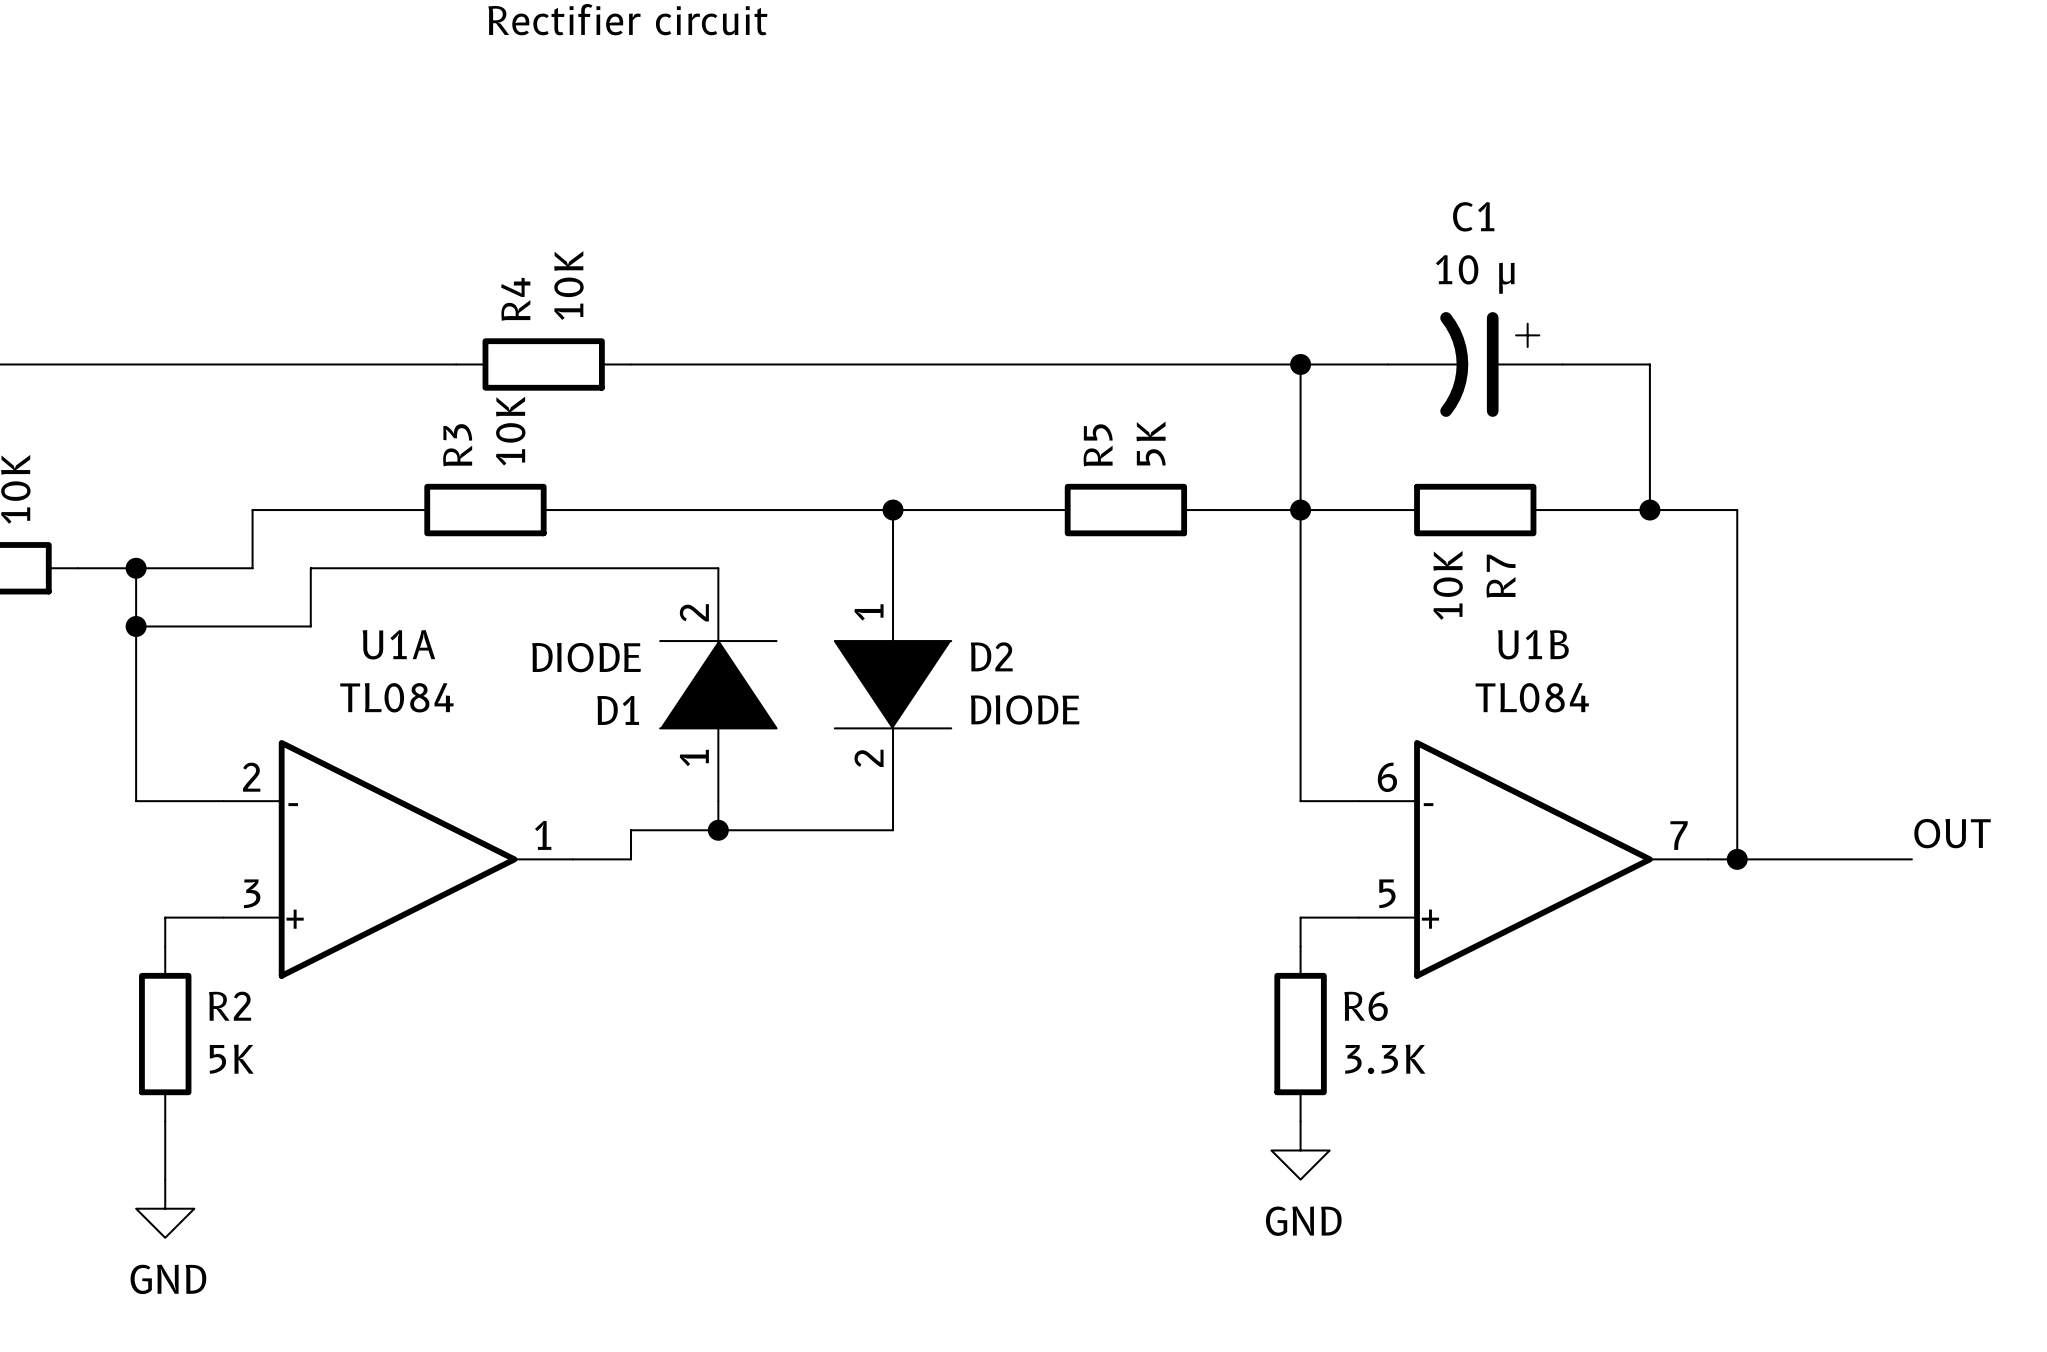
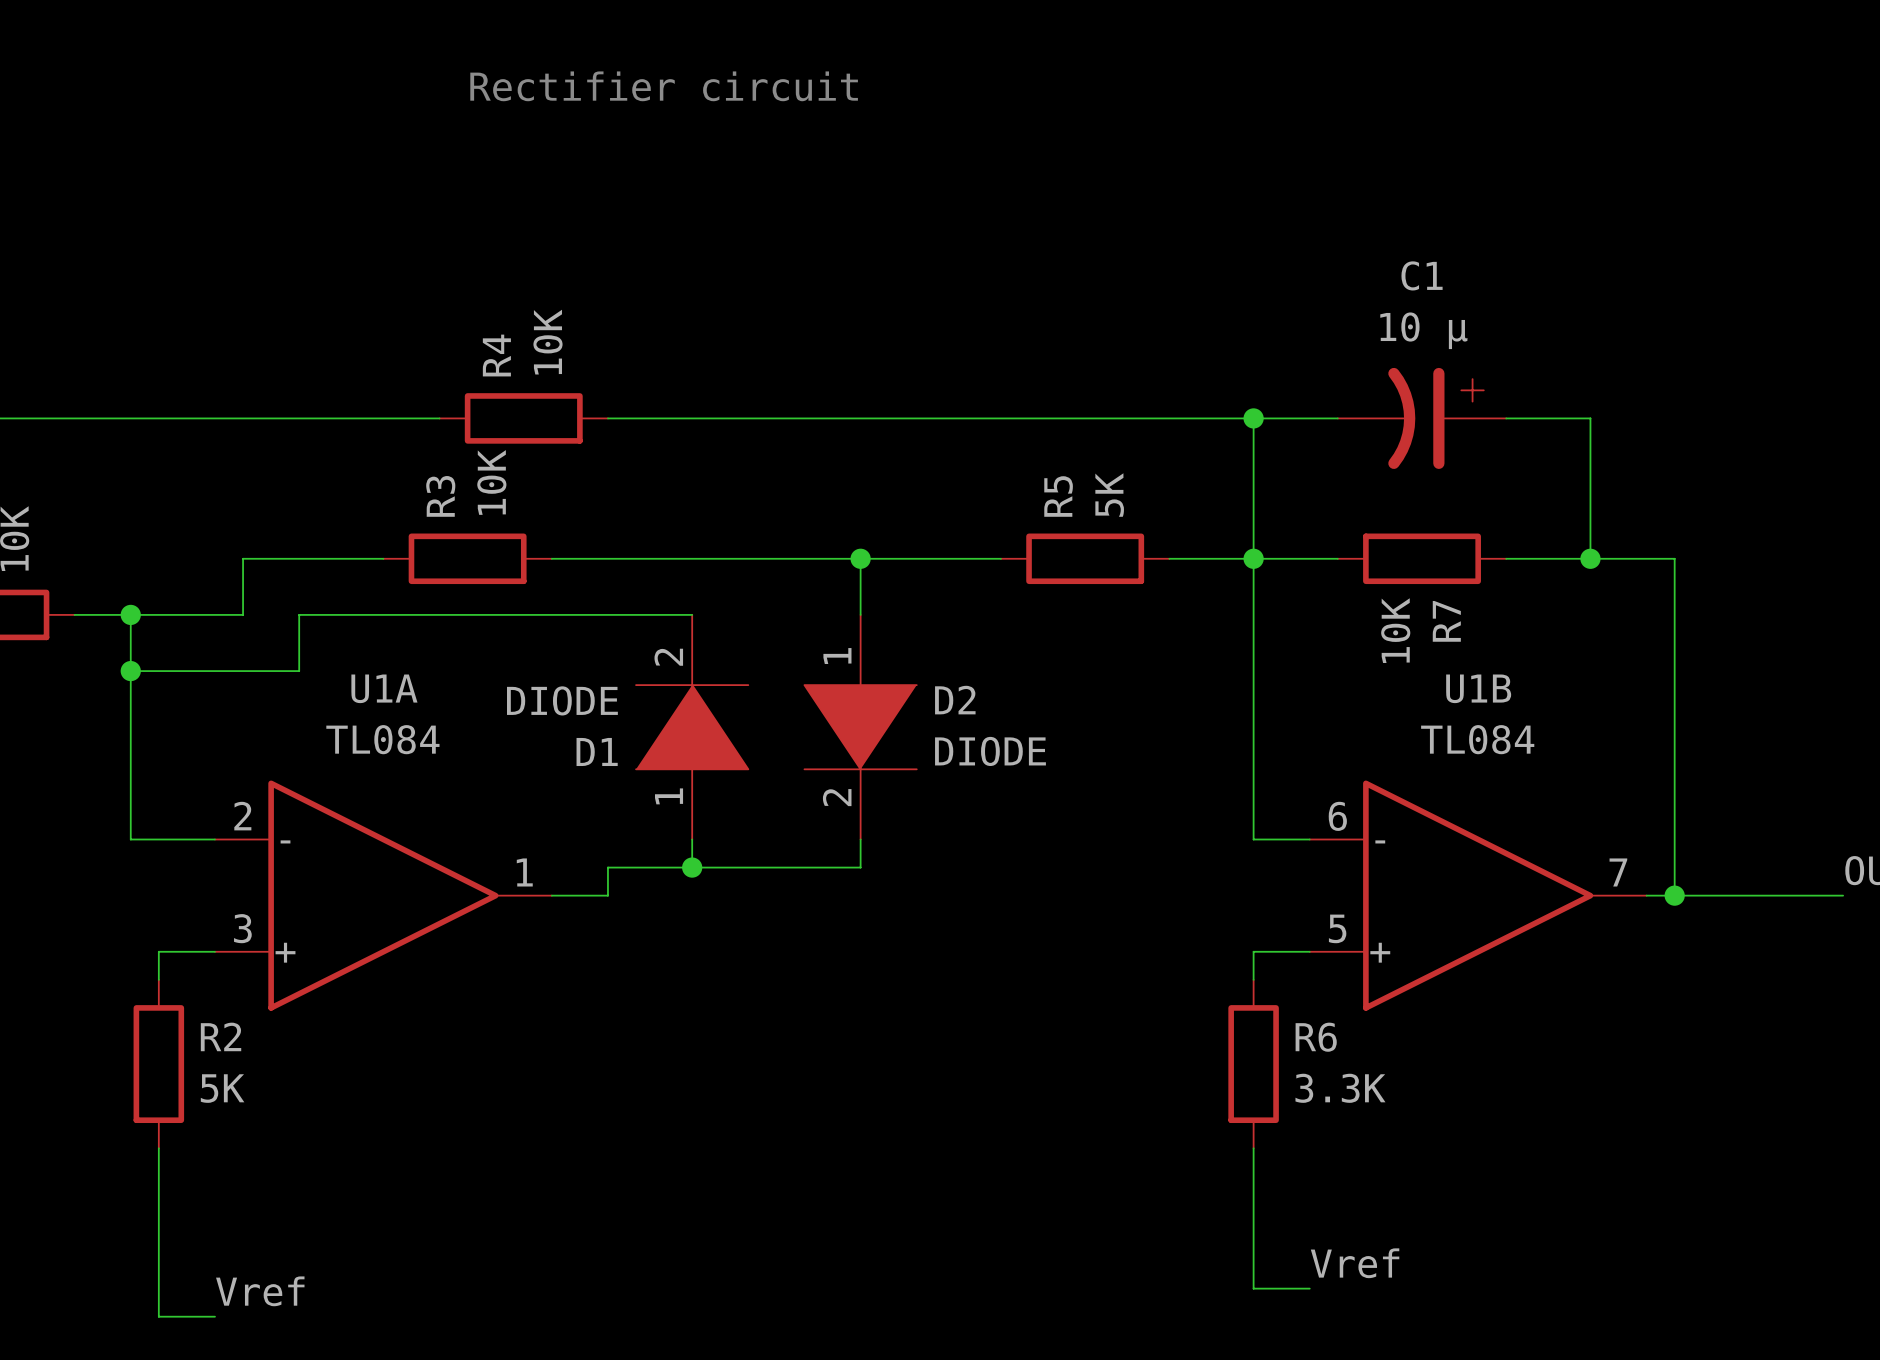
wire: none -> (1253, 1148) (1253, 1288) (1309, 1288)
power symbol: GND (1300, 1150) -> none
wire: none -> (158, 1204) (158, 1316) (214, 1316)
power symbol: GND (165, 1208) -> none
label: none -> Vref (1355, 1263)
label: none -> Vref (260, 1291)

